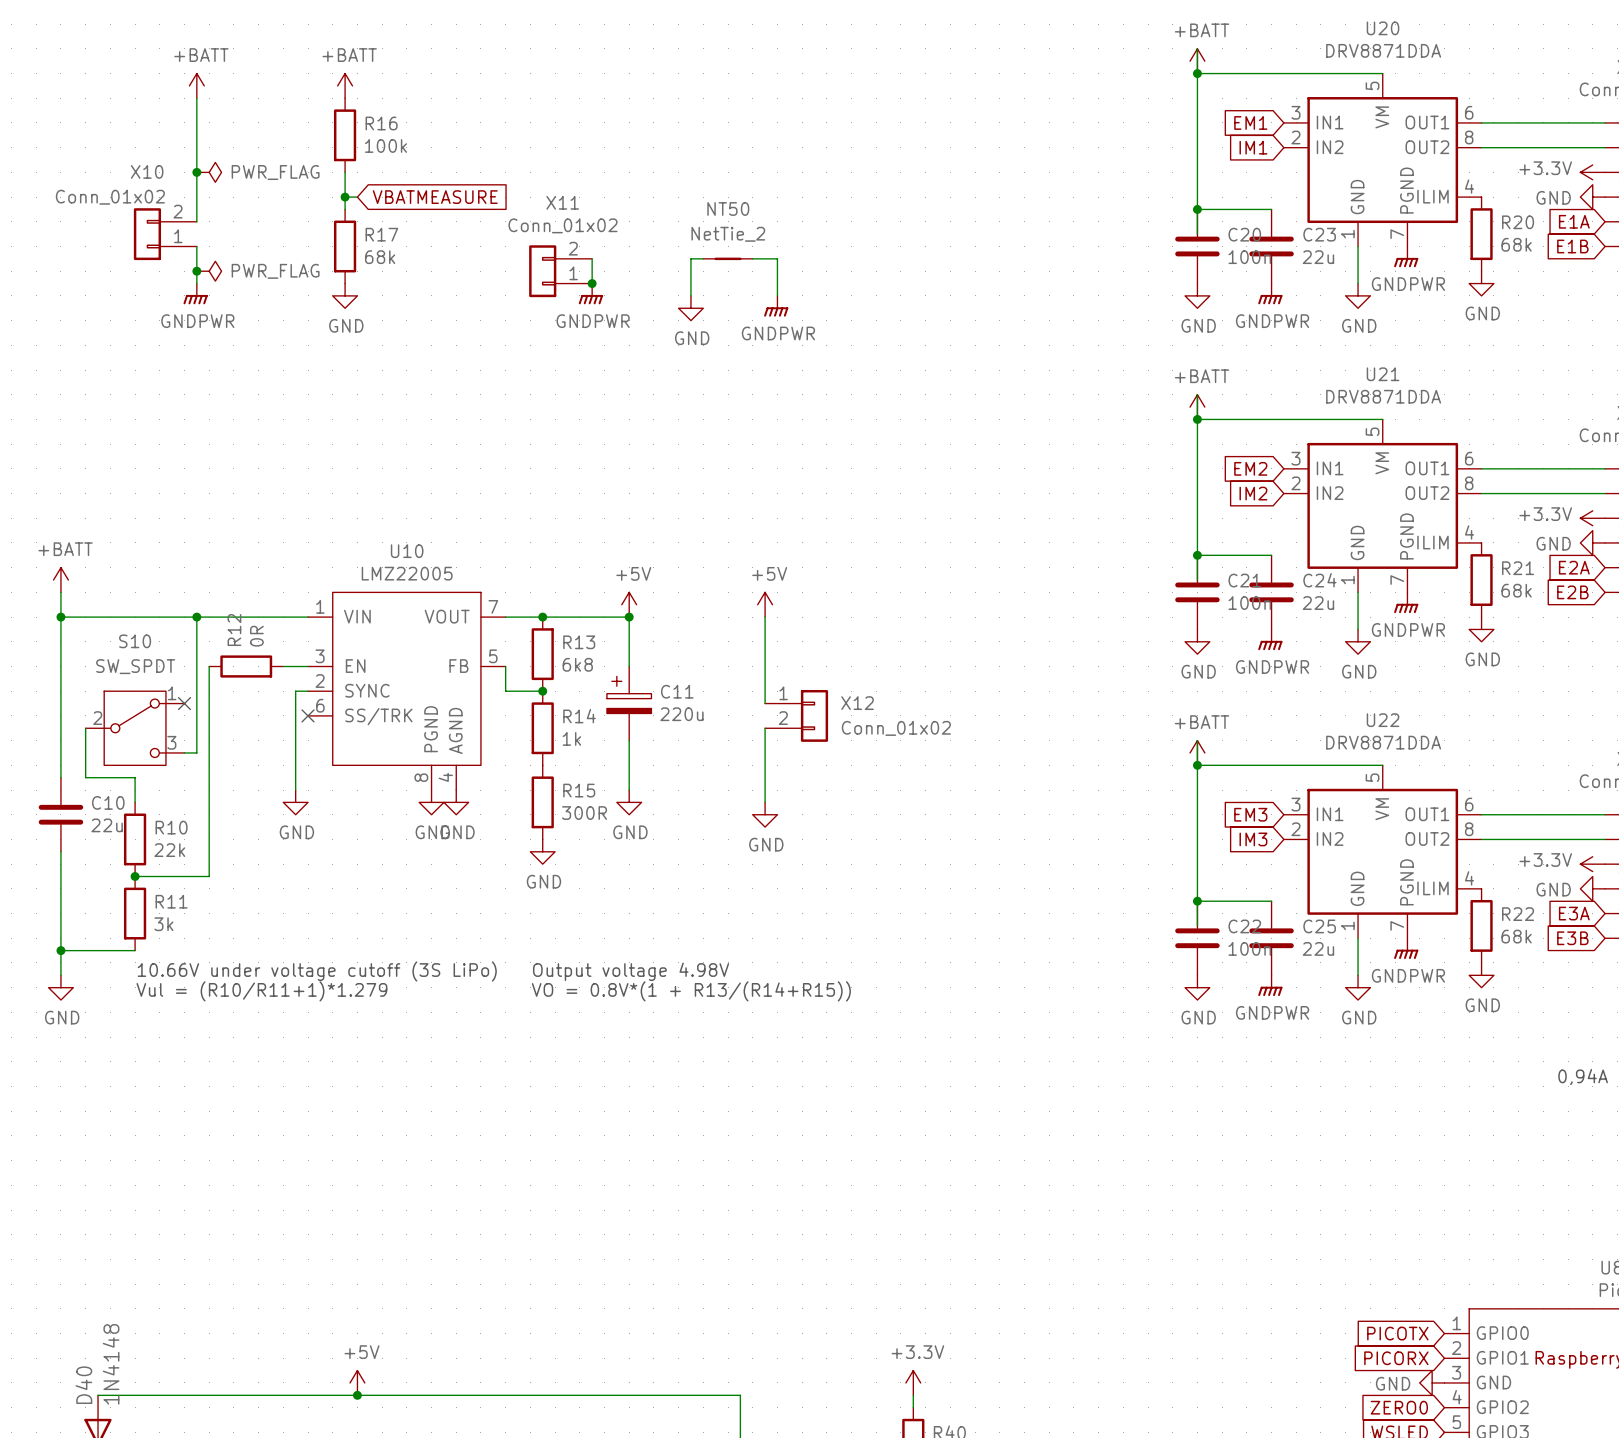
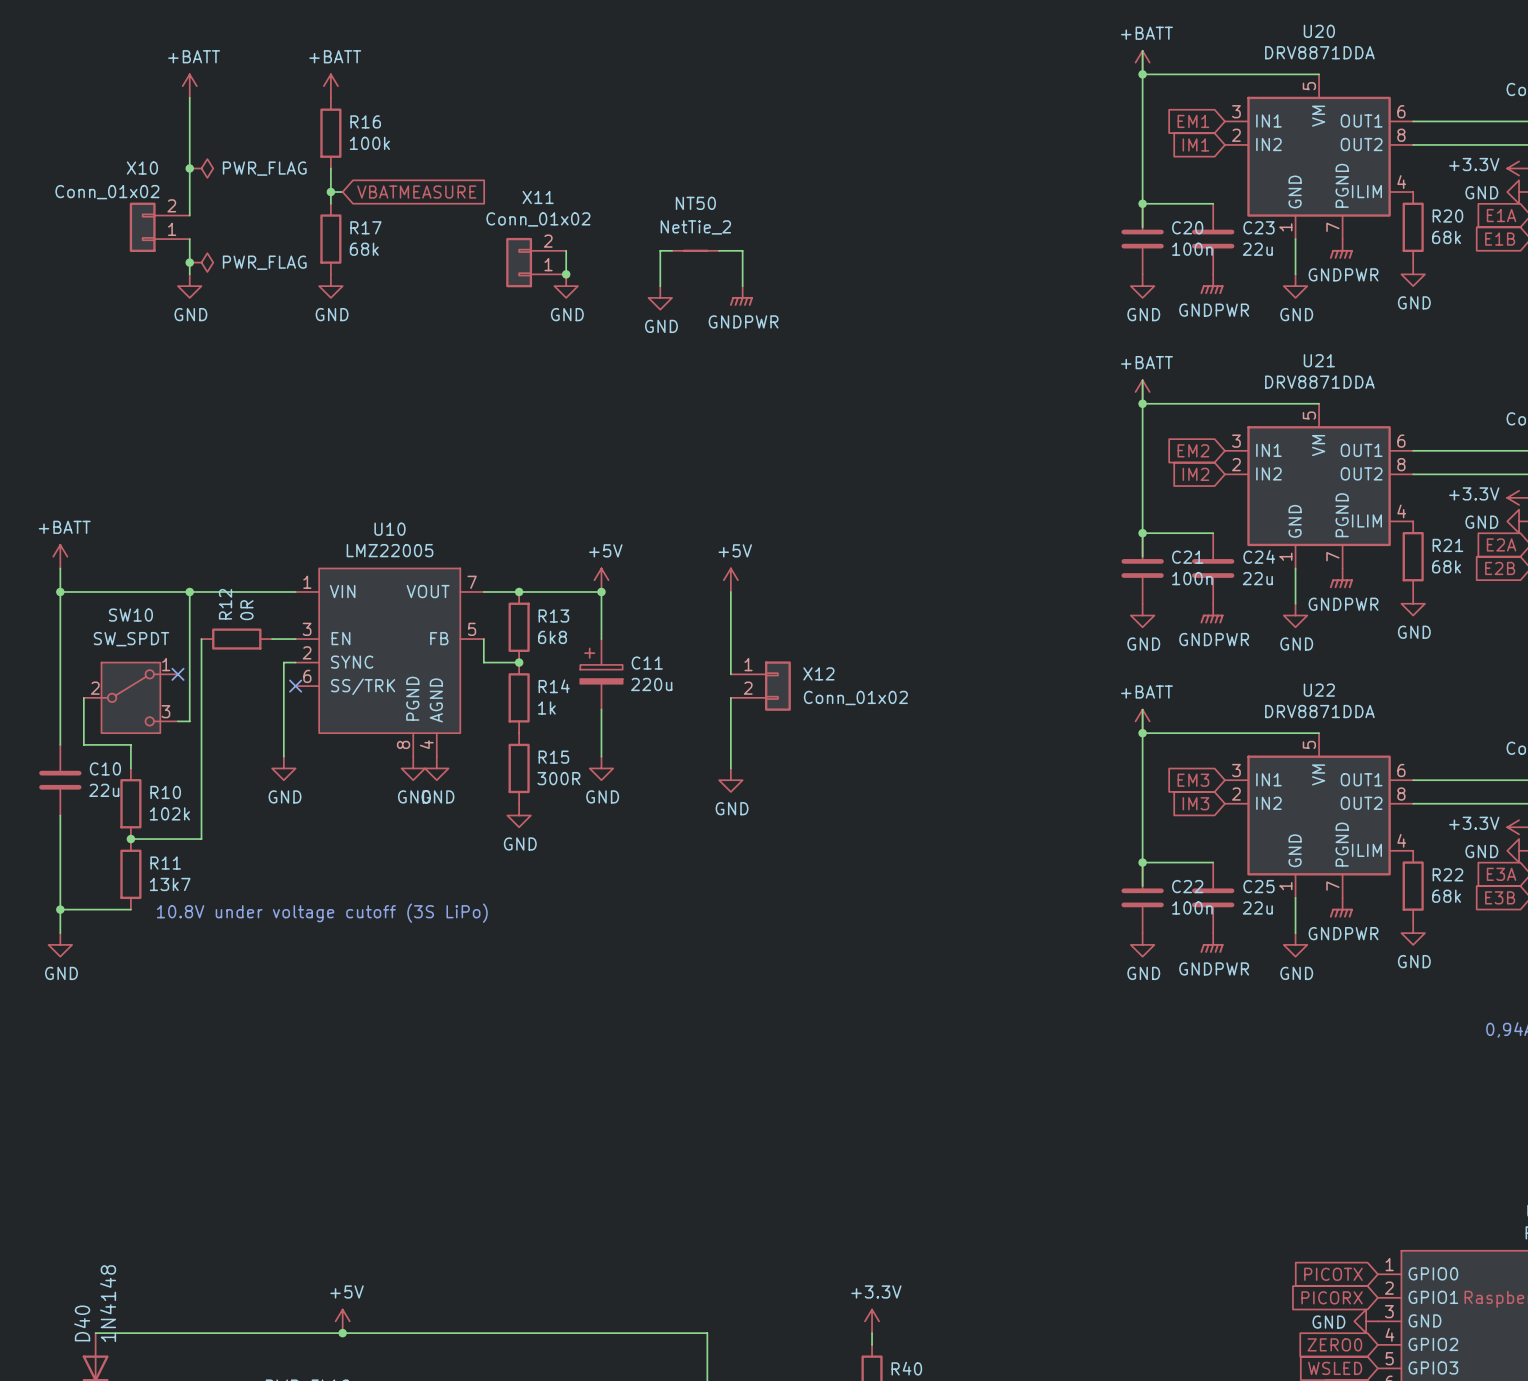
power symbol: GNDPWR (195, 293) -> GND (189, 286)
power symbol: GNDPWR (590, 293) -> GND (566, 286)
S10 name: S10 (135, 641) -> SW10 (130, 615)
R10 value: 22k (169, 850) -> 102k (169, 813)
R11 value: 3k (163, 924) -> 13k7 (170, 884)
text: 10.66V under voltage cutoff (3S LiPo) (317, 971) -> 10.8V under voltage cutoff (3S LiPo) (322, 913)
text: Output voltage 4.98V (631, 971) -> none
text: Vul = (R10/R11+1)*1.279 (261, 991) -> none
text: VO = 0.8V*(1 + R13/(R14+R15)) (691, 991) -> none

